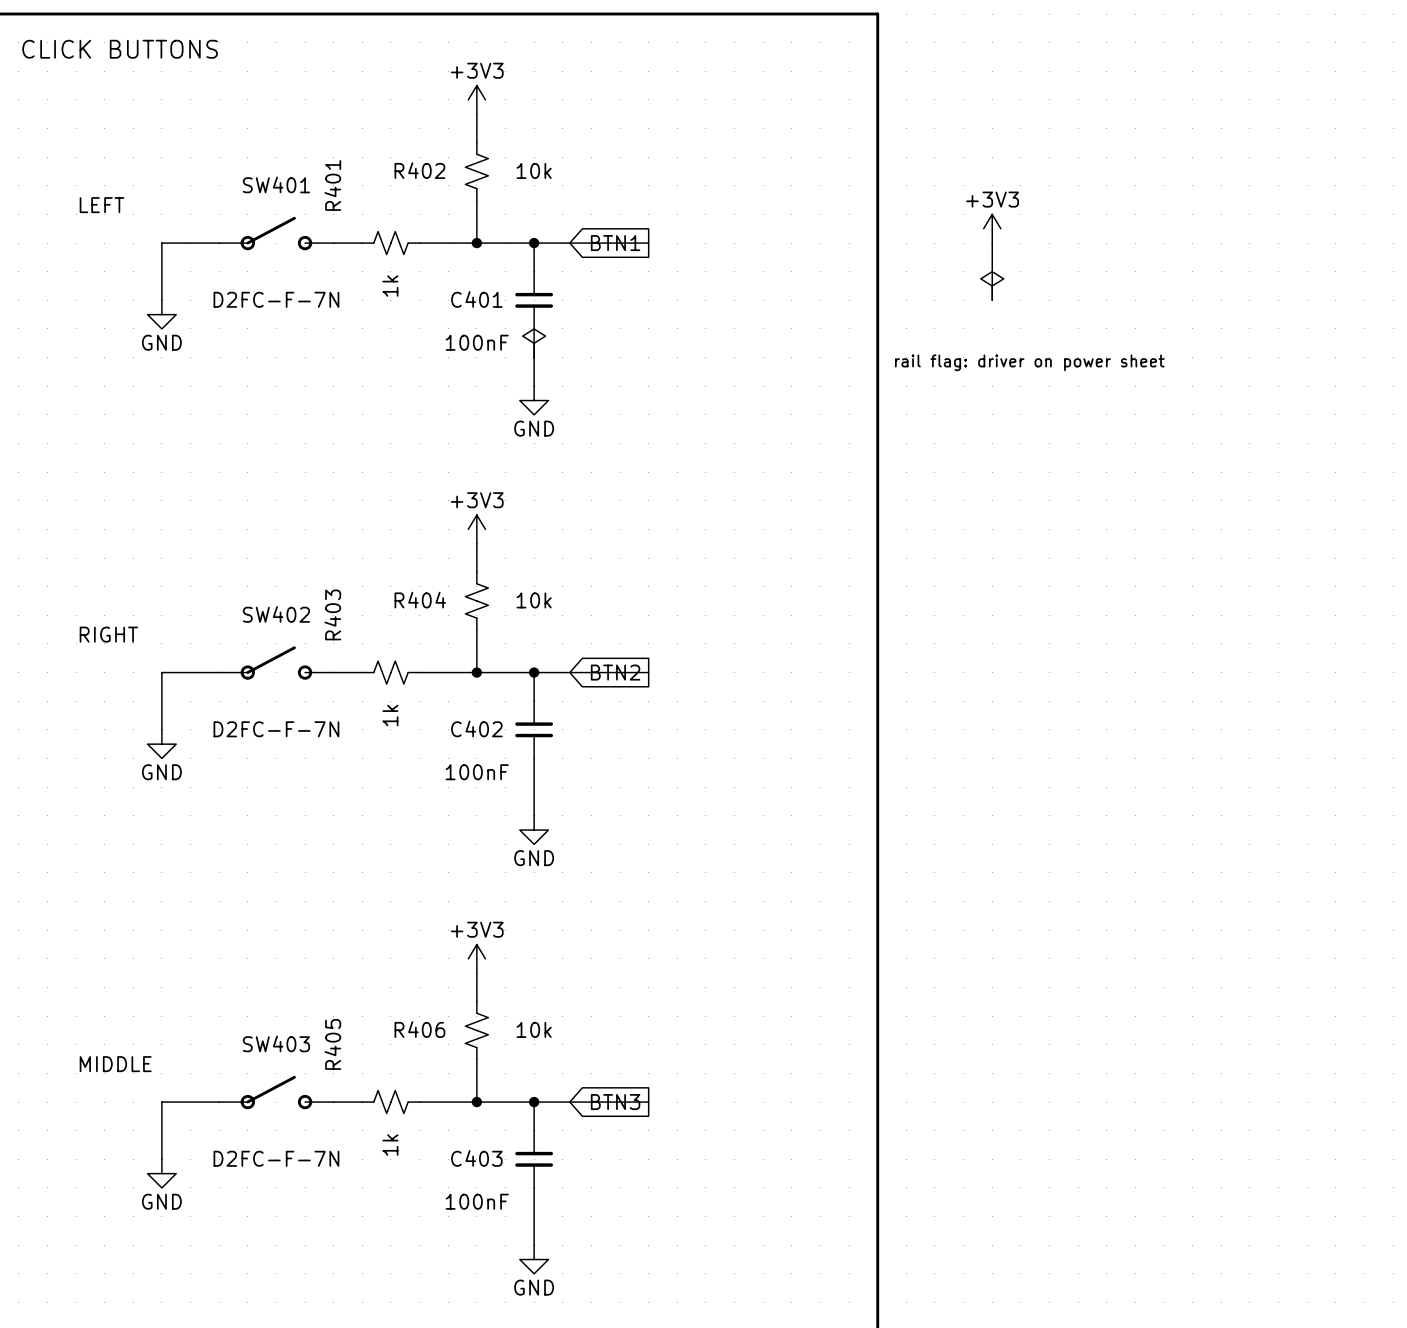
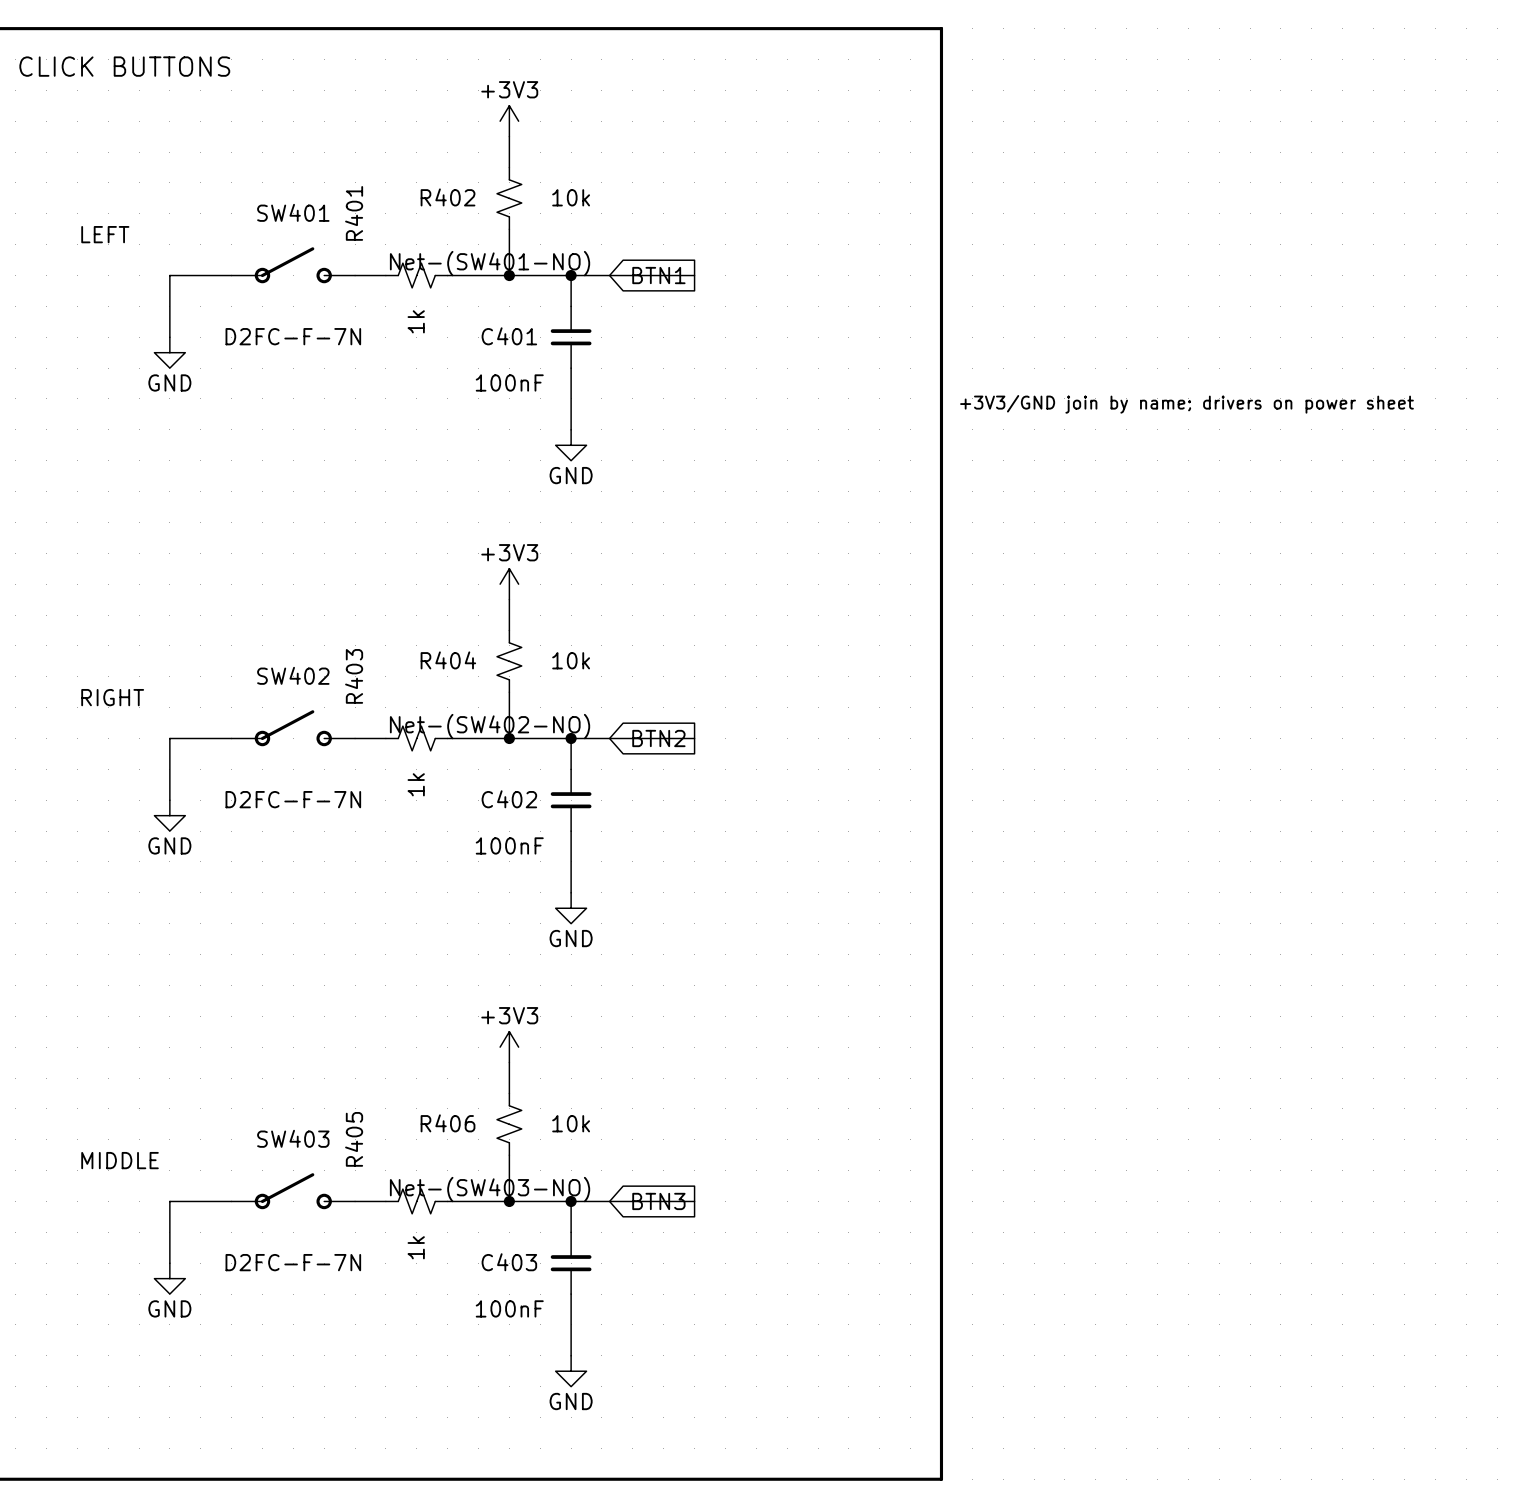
power symbol: +3V3 (992, 228) -> none
label: none -> Net-(SW401-NO) (490, 263)
wire: (992, 243) (992, 300) -> none
power symbol: (992, 286) -> none
power symbol: (534, 343) -> none
text: rail flag: driver on power sheet (1029, 362) -> +3V3/GND join by name; drivers on power sheet (1186, 404)
label: none -> Net-(SW402-NO) (490, 726)
label: none -> Net-(SW403-NO) (490, 1189)

